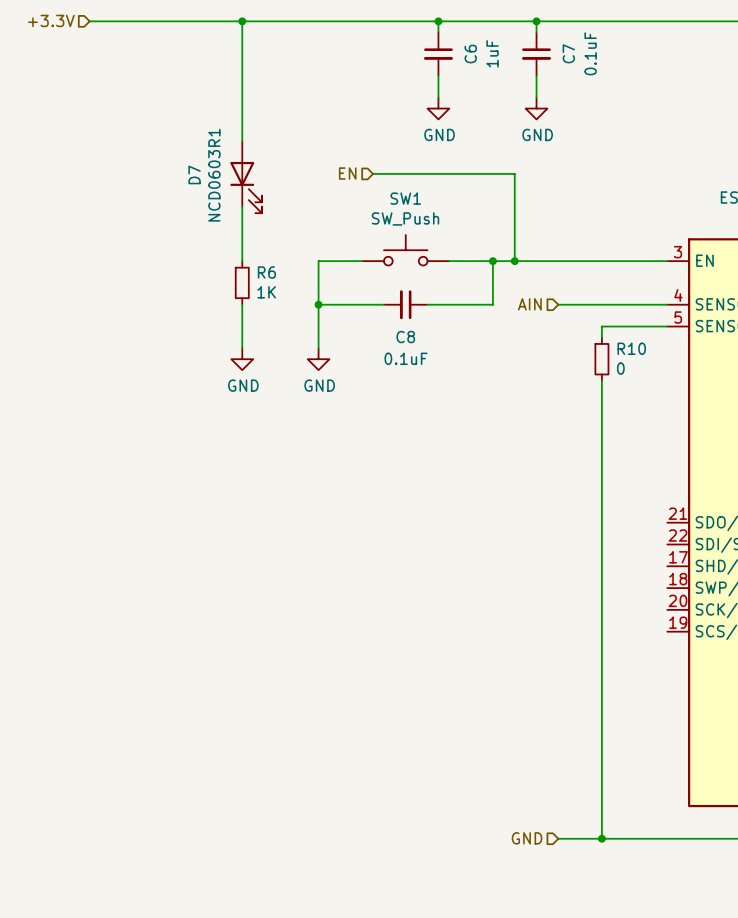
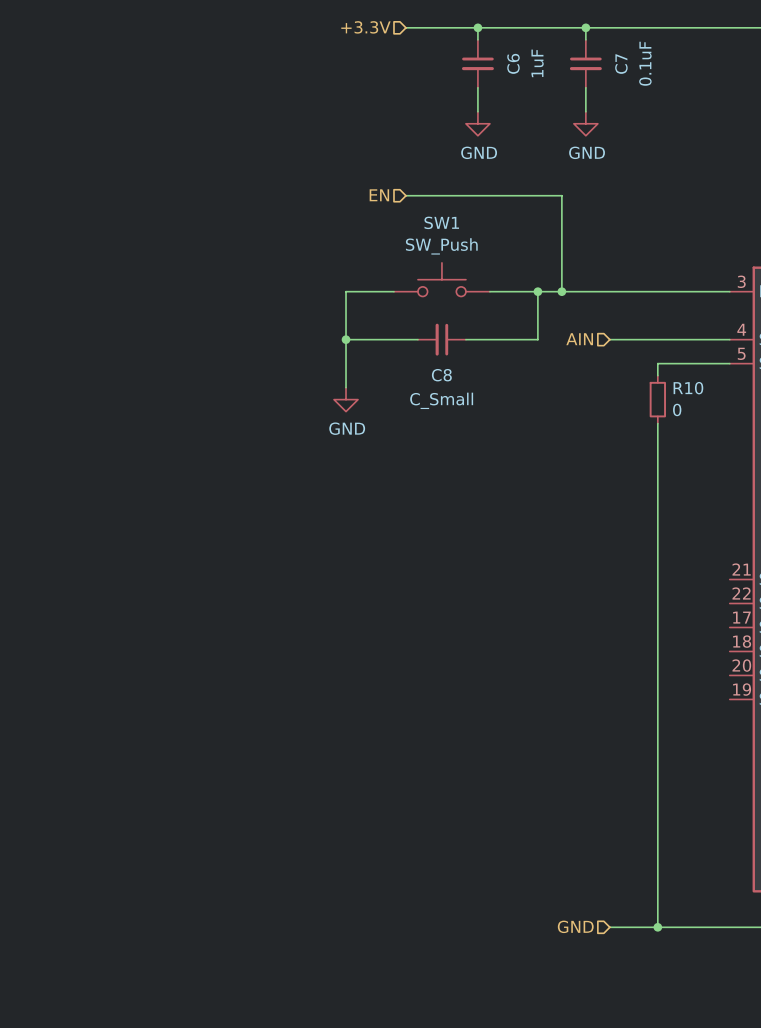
hierarchical label: +3.3V (51, 20) -> none
hierarchical label: none -> +3.3V (365, 27)
wire: (89, 21) (373, 21) -> none
wire: (242, 21) (242, 141) -> none
junction: (242, 21) -> none
D7: NCD0603R1 (246, 177) -> none
wire: (242, 206) (242, 261) -> none
R6: 1K (242, 282) -> none
wire: (242, 304) (242, 348) -> none
C8 value: 0.1uF (406, 358) -> C_Small (441, 400)
power symbol: GND (242, 359) -> none

